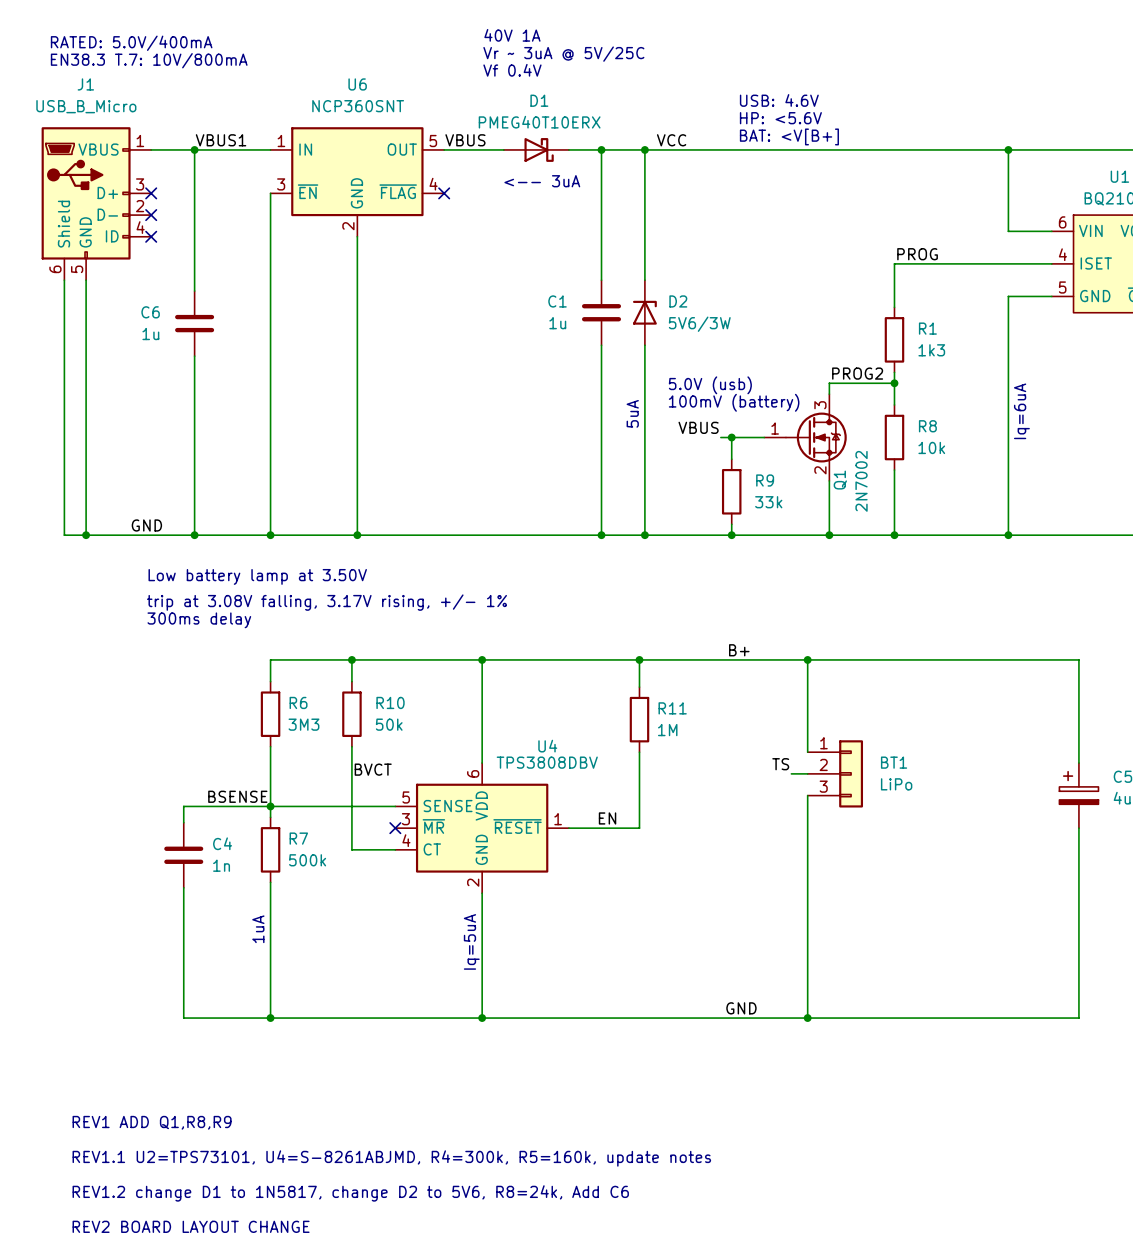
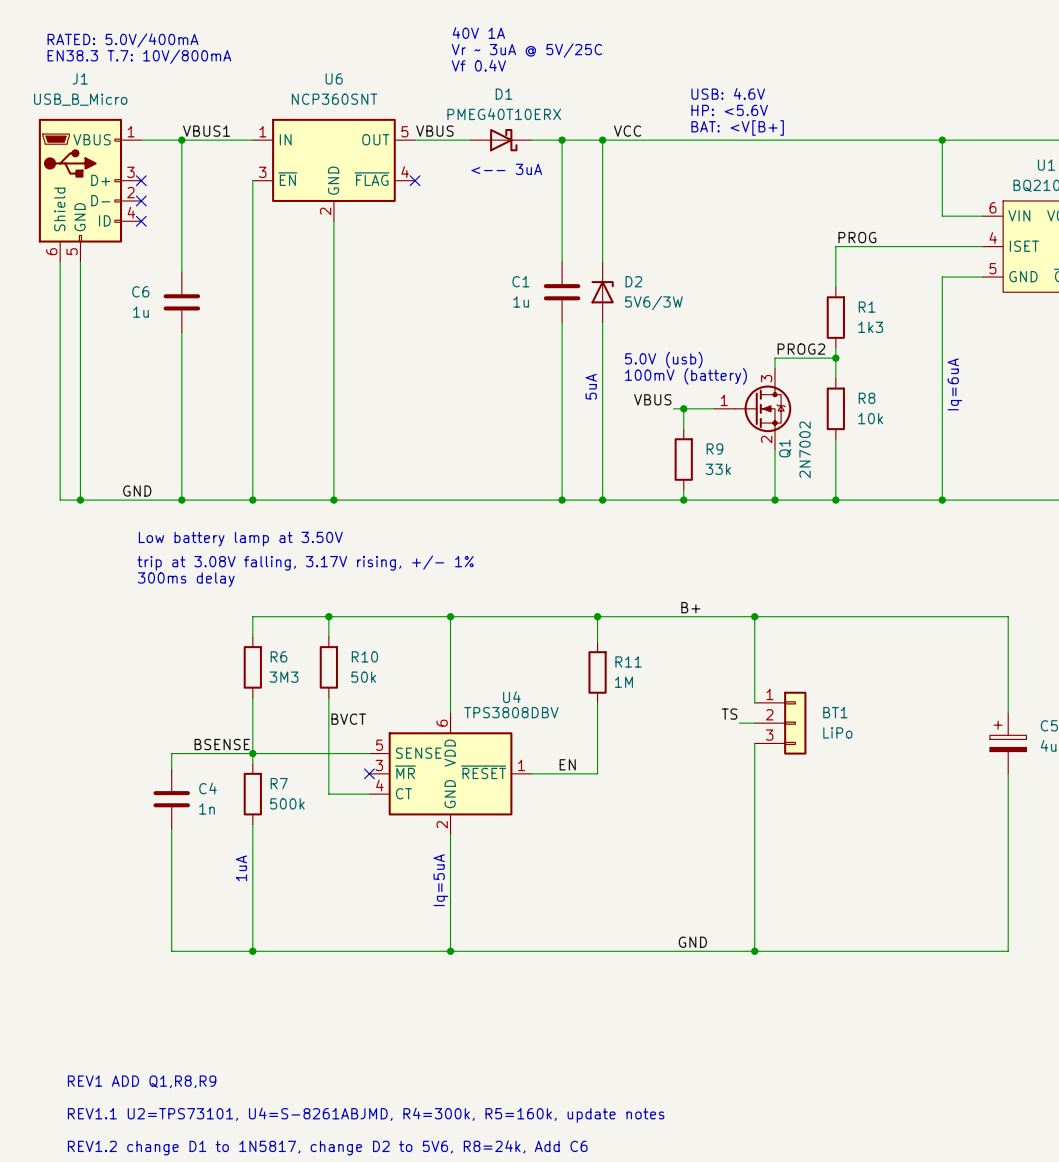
text: REV1 ADD Q1,R8,R9 (152, 1122) -> none
text: REV1.1 U2=TPS73101, U4=S-8261ABJMD, R4=300k, R5=160k, update notes (391, 1158) -> REV1 ADD Q1,R8,R9 (142, 1081)
text: REV1.2 change D1 to 1N5817, change D2 to 5V6, R8=24k, Add C6 (350, 1193) -> REV1.1 U2=TPS73101, U4=S-8261ABJMD, R4=300k, R5=160k, update notes (366, 1115)
text: REV2 BOARD LAYOUT CHANGE (191, 1226) -> REV1.2 change D1 to 1N5817, change D2 to 5V6, R8=24k, Add C6 (327, 1147)

